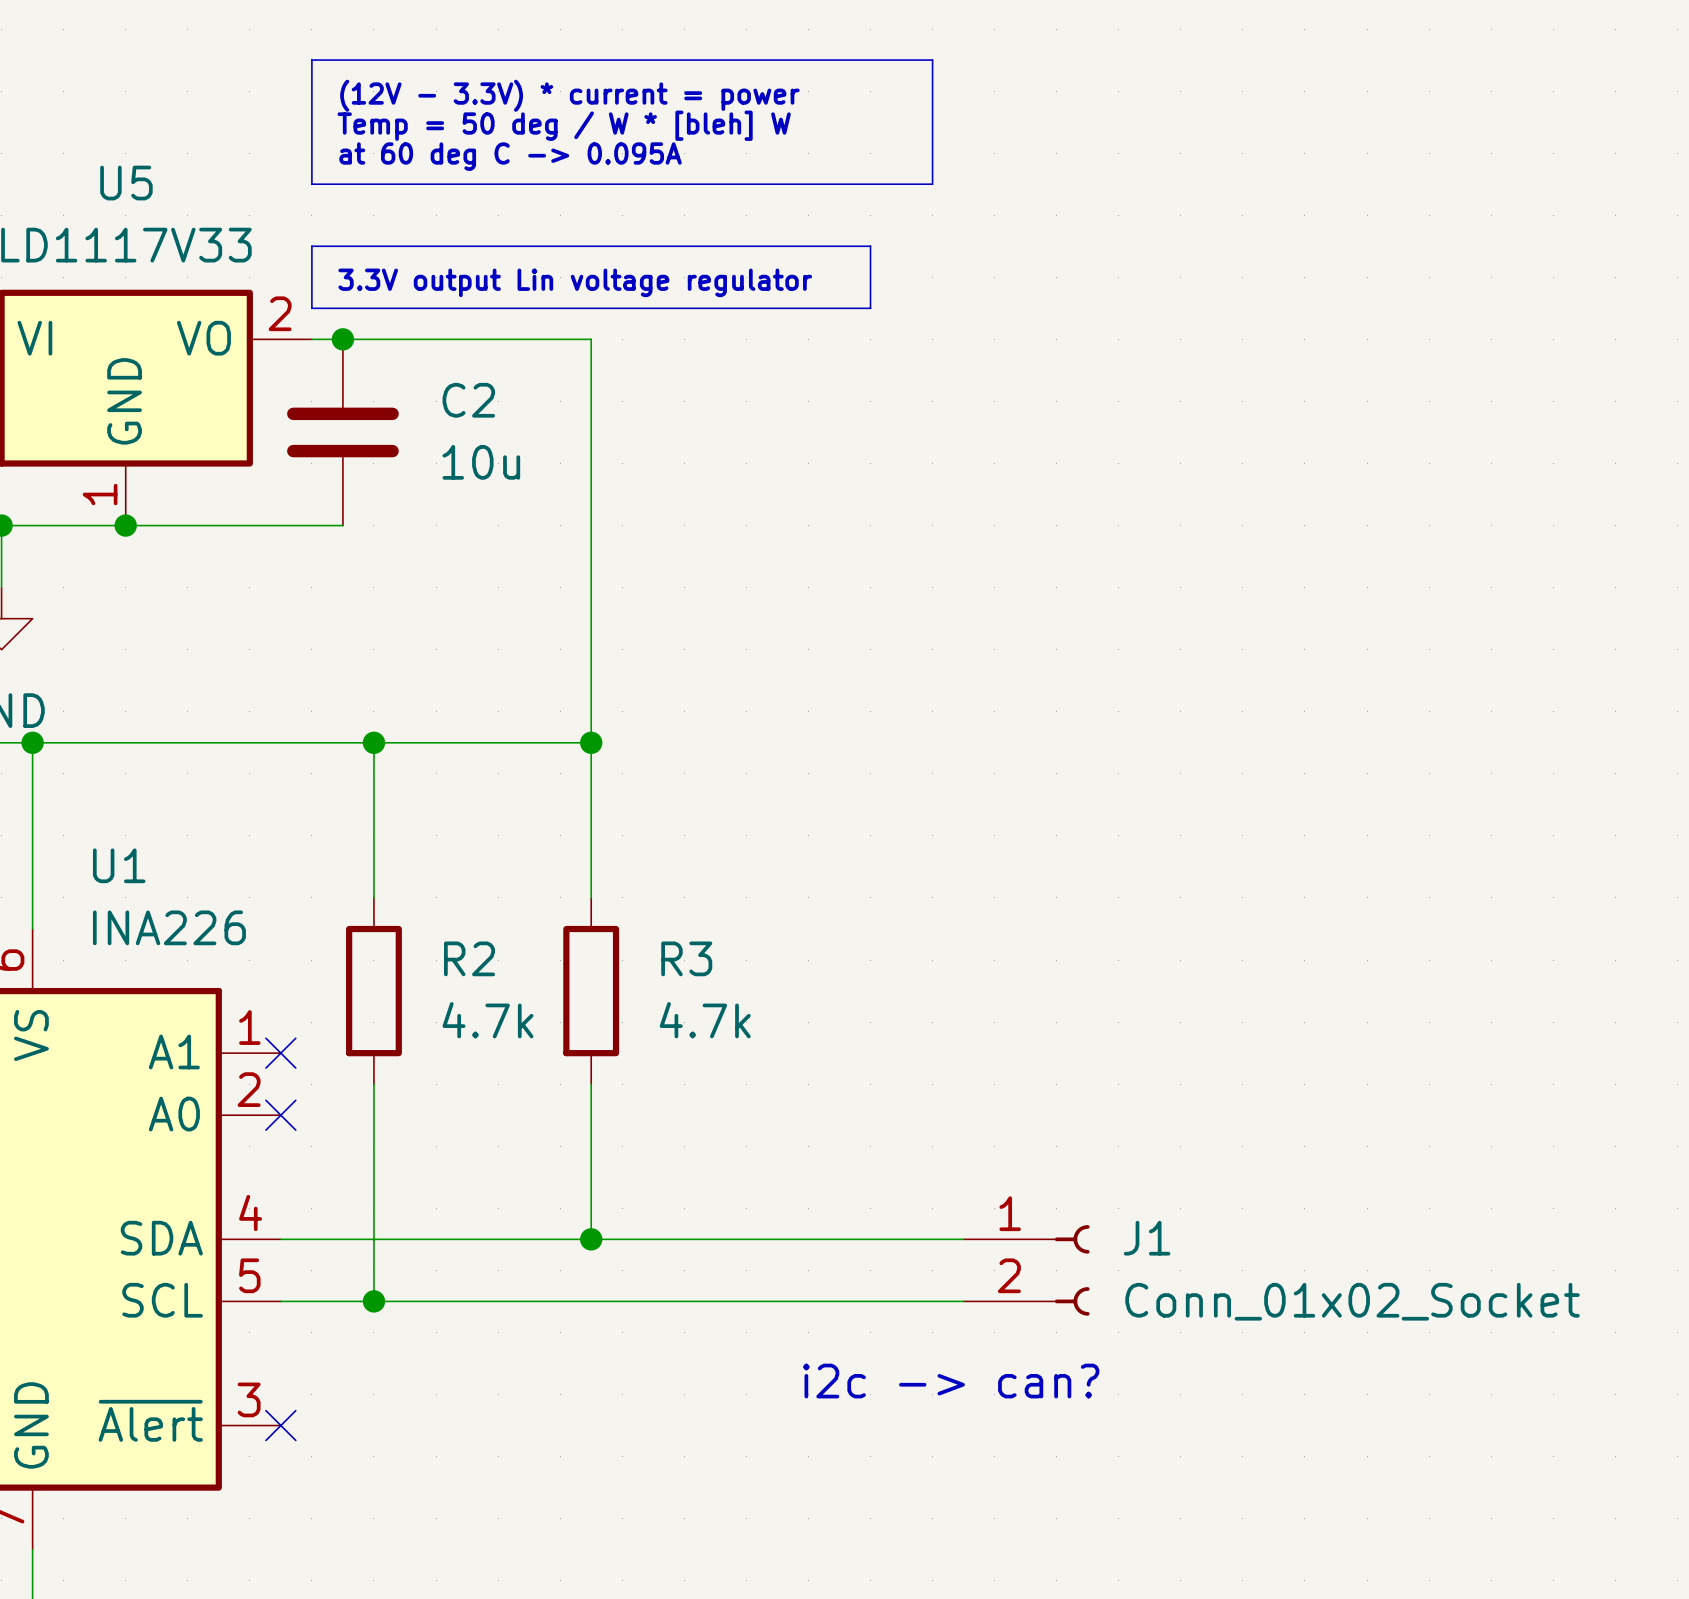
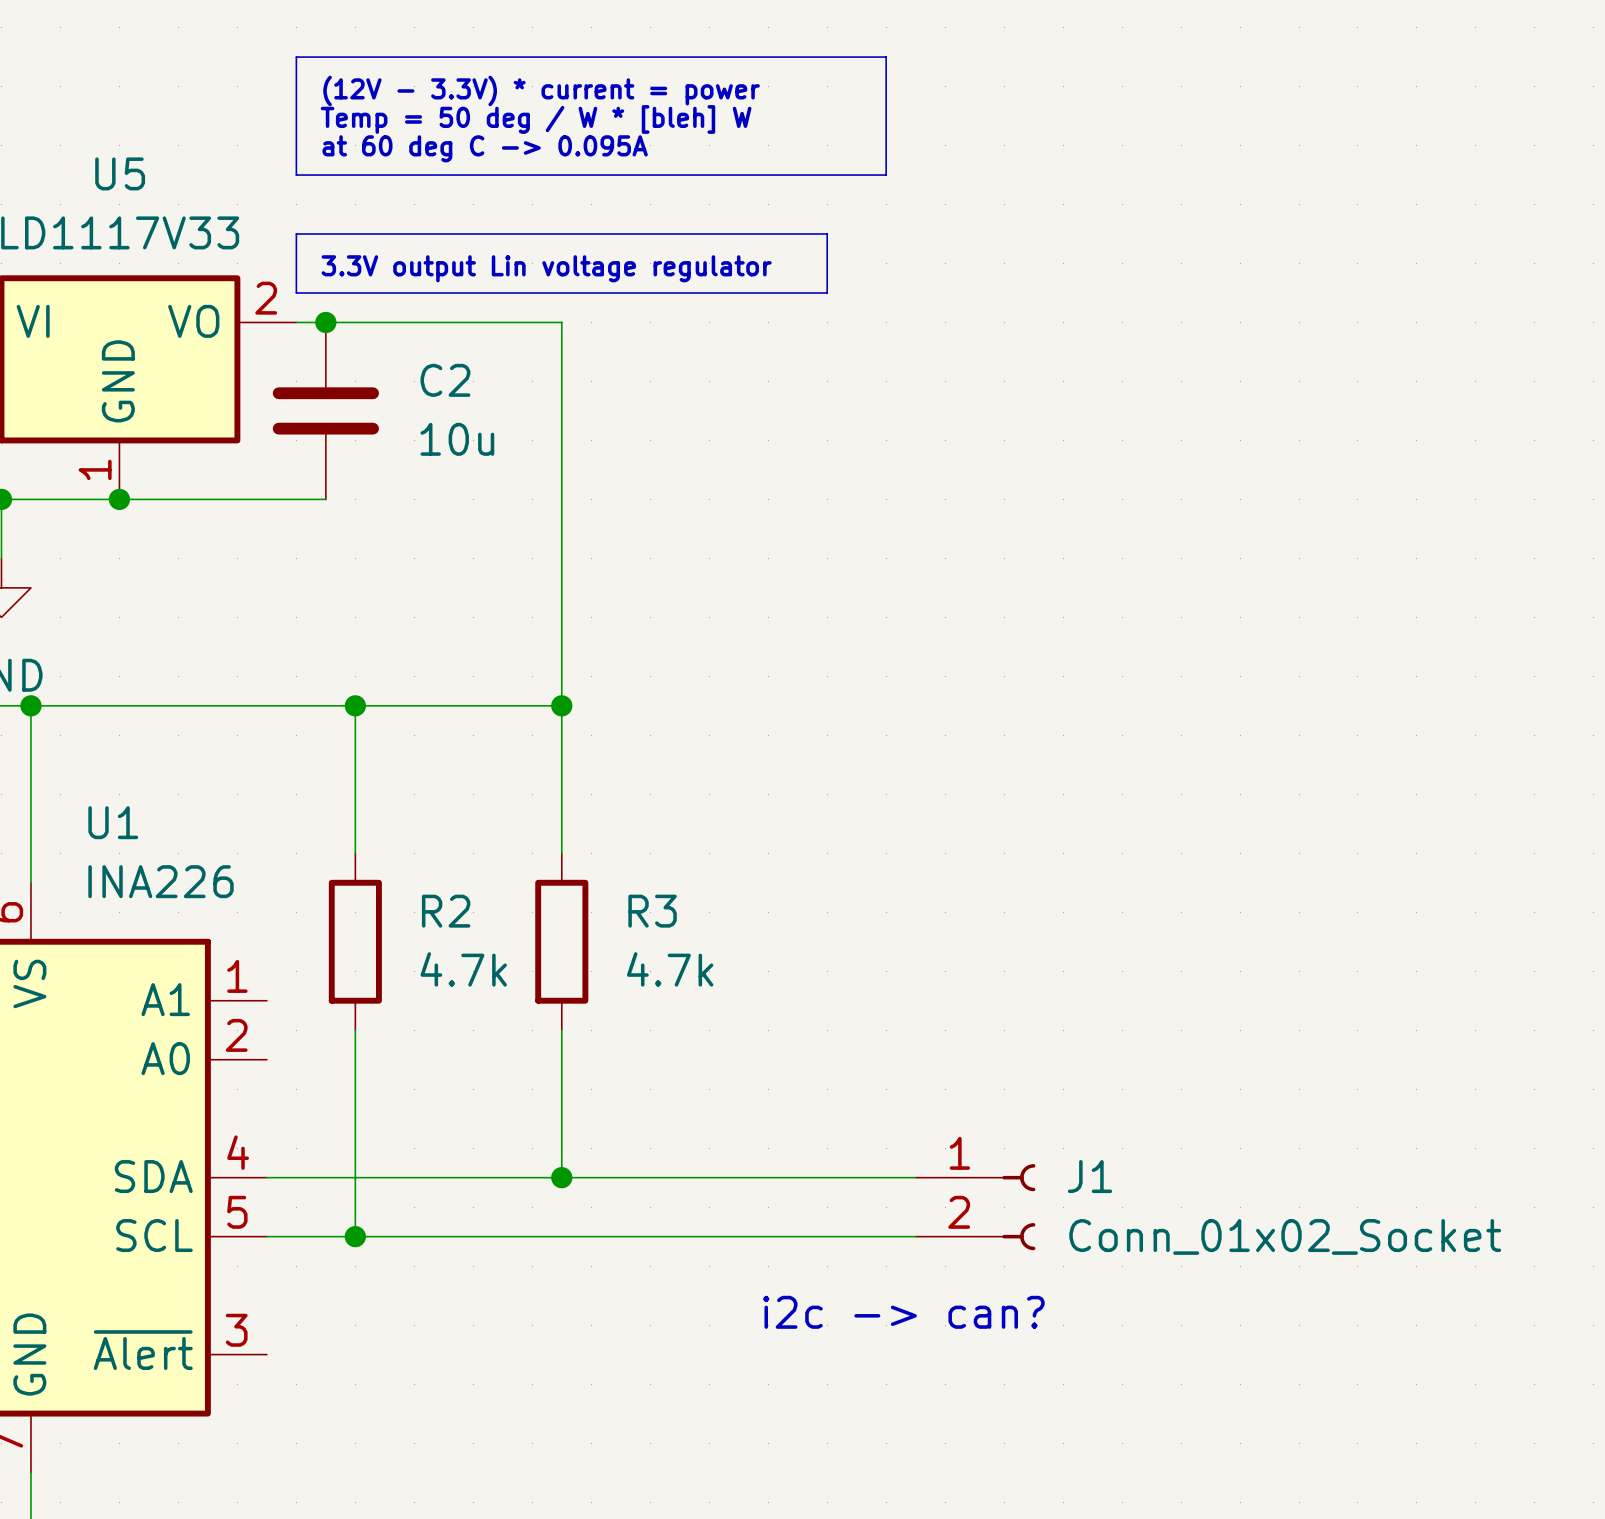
no-connect mark: (280, 1053) -> none
no-connect mark: (280, 1115) -> none
no-connect mark: (280, 1425) -> none

